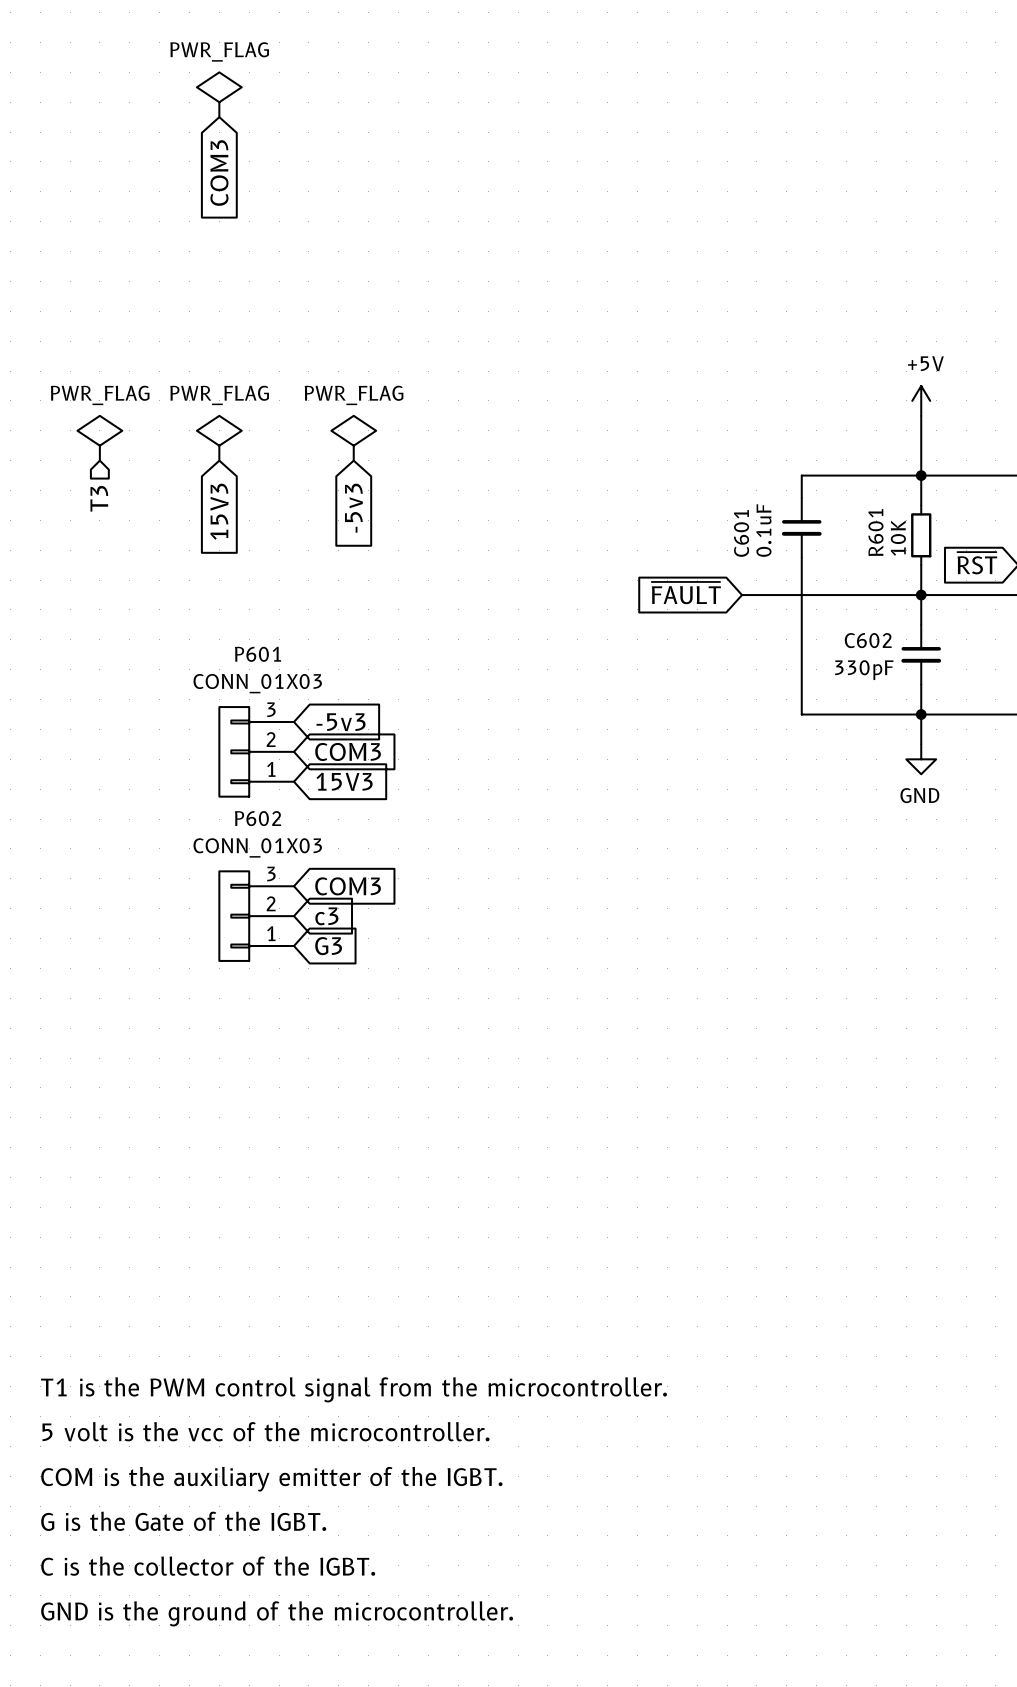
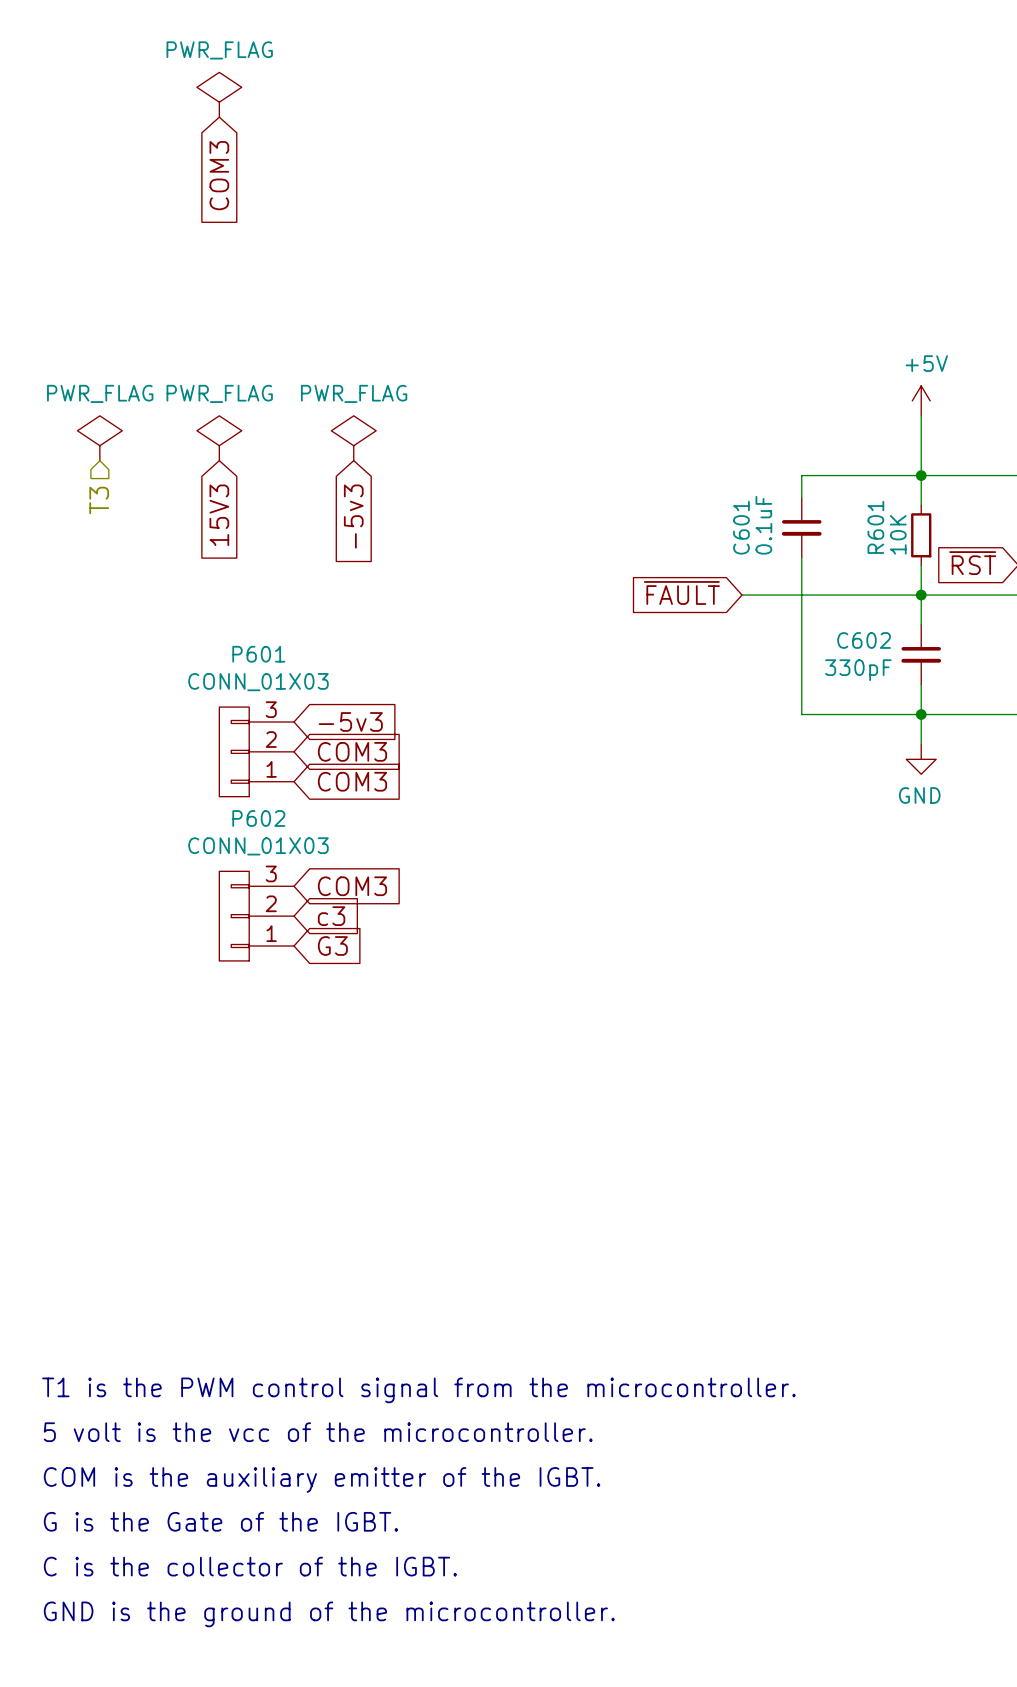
global label: 15V3 (344, 781) -> COM3 (352, 781)

